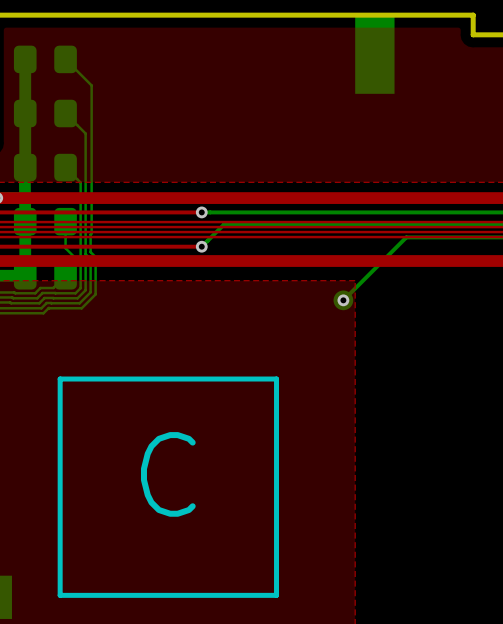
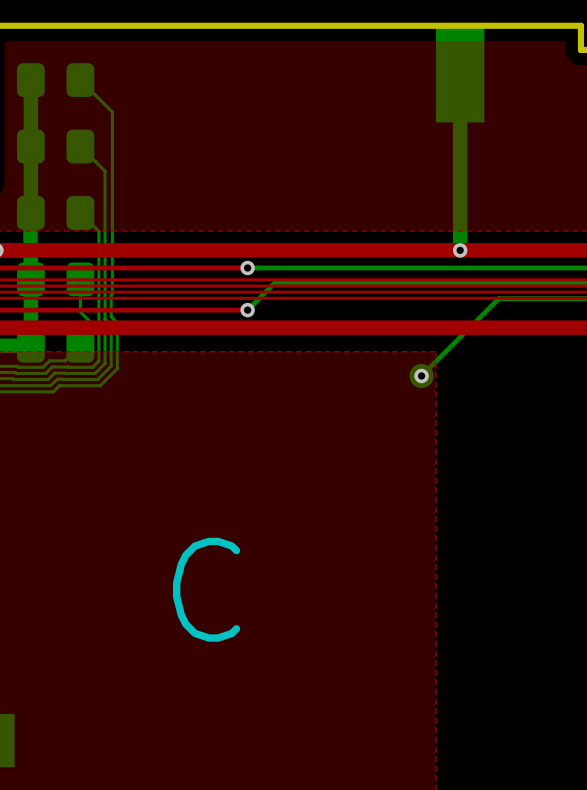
bottom track: none -> (460, 74) (460, 250)
via: none -> (460, 250)
line: (60, 379) (60, 595) (276, 595) (276, 379) (60, 379) -> none

